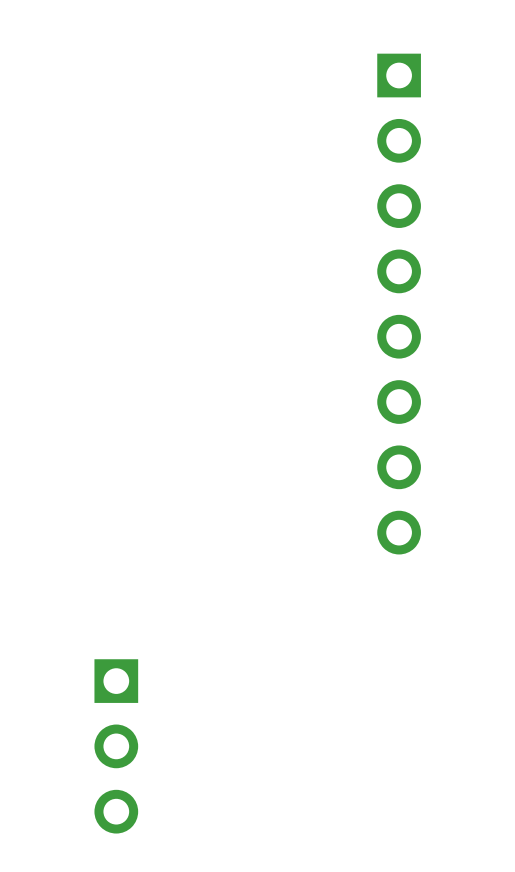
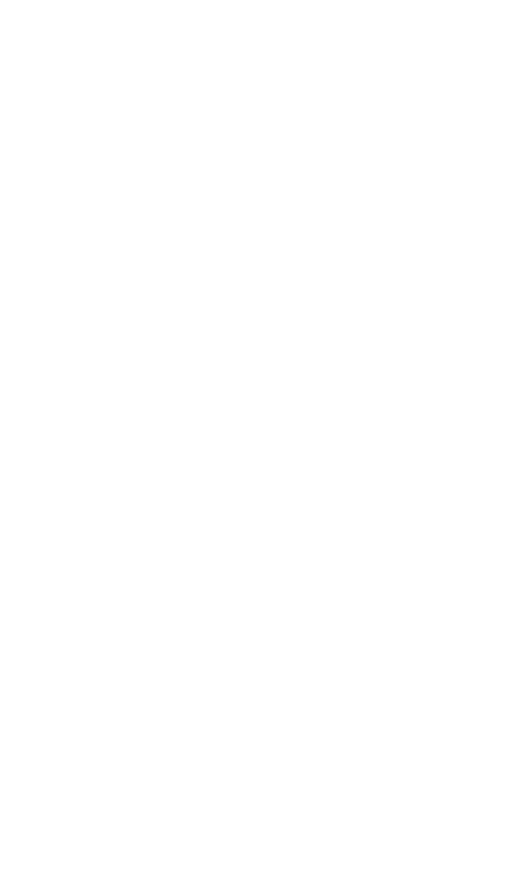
part: (399, 304) -> none
part: (116, 746) -> none

